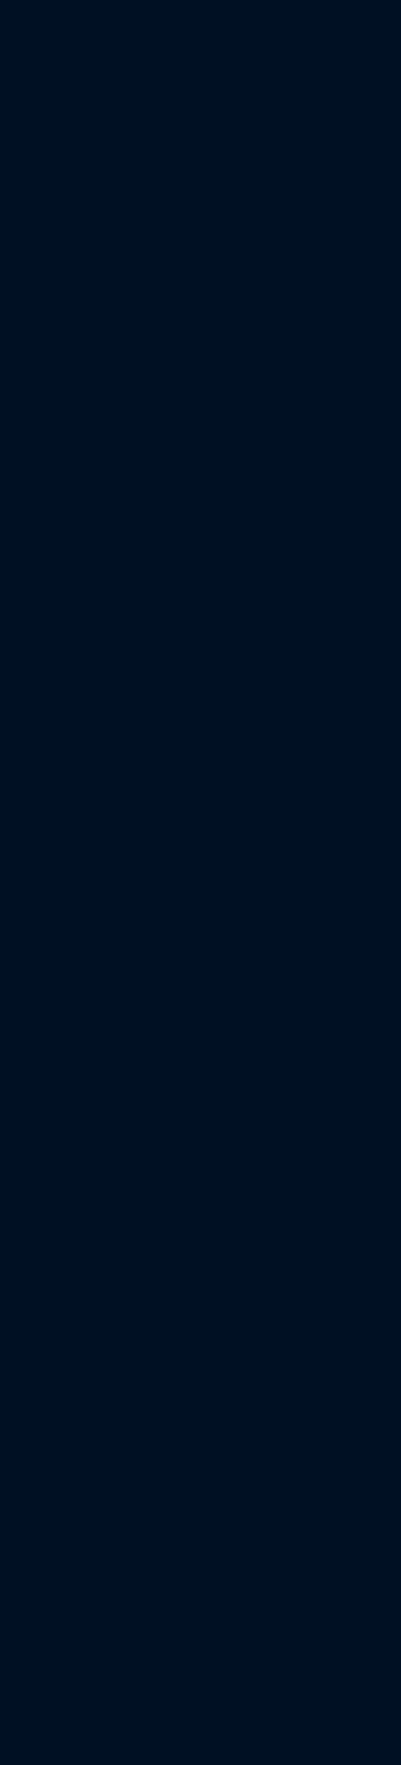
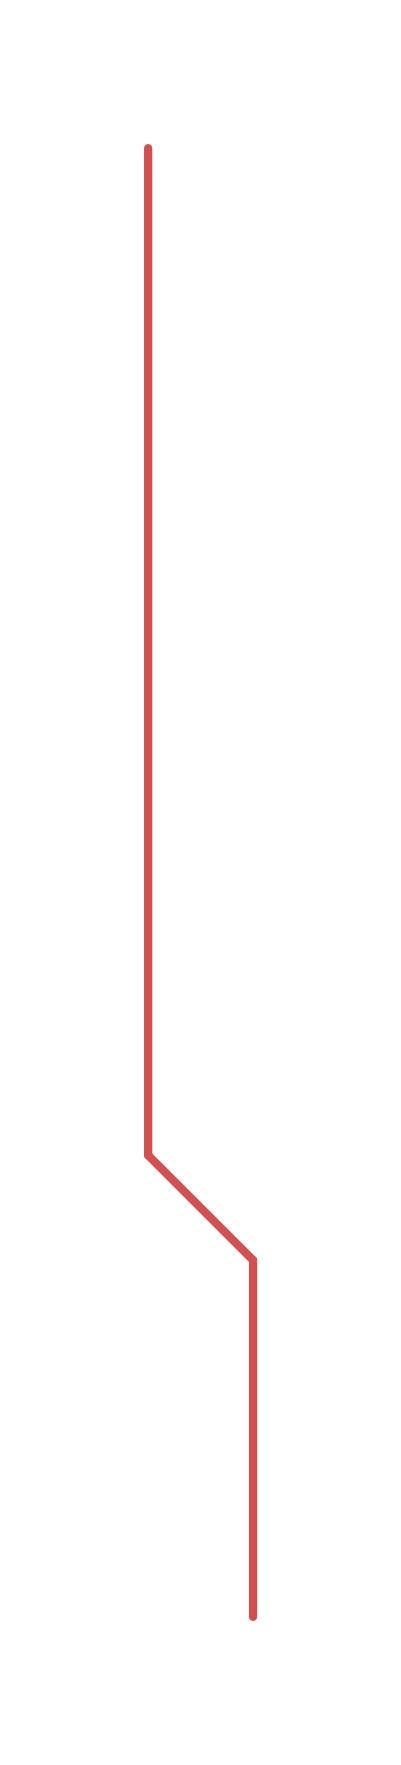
track: none -> (148, 148) (148, 1155) (253, 1260) (253, 1616)

